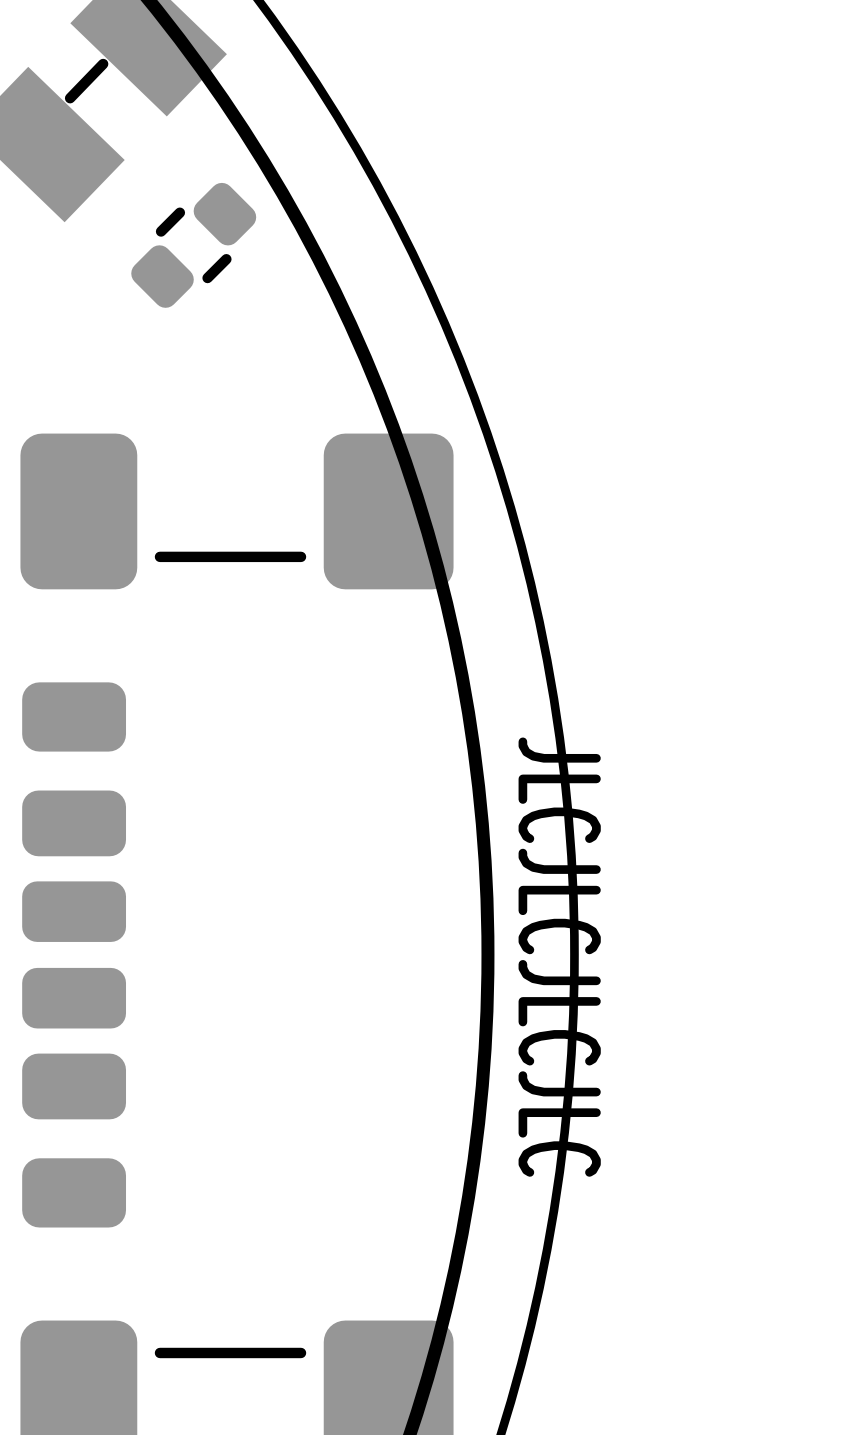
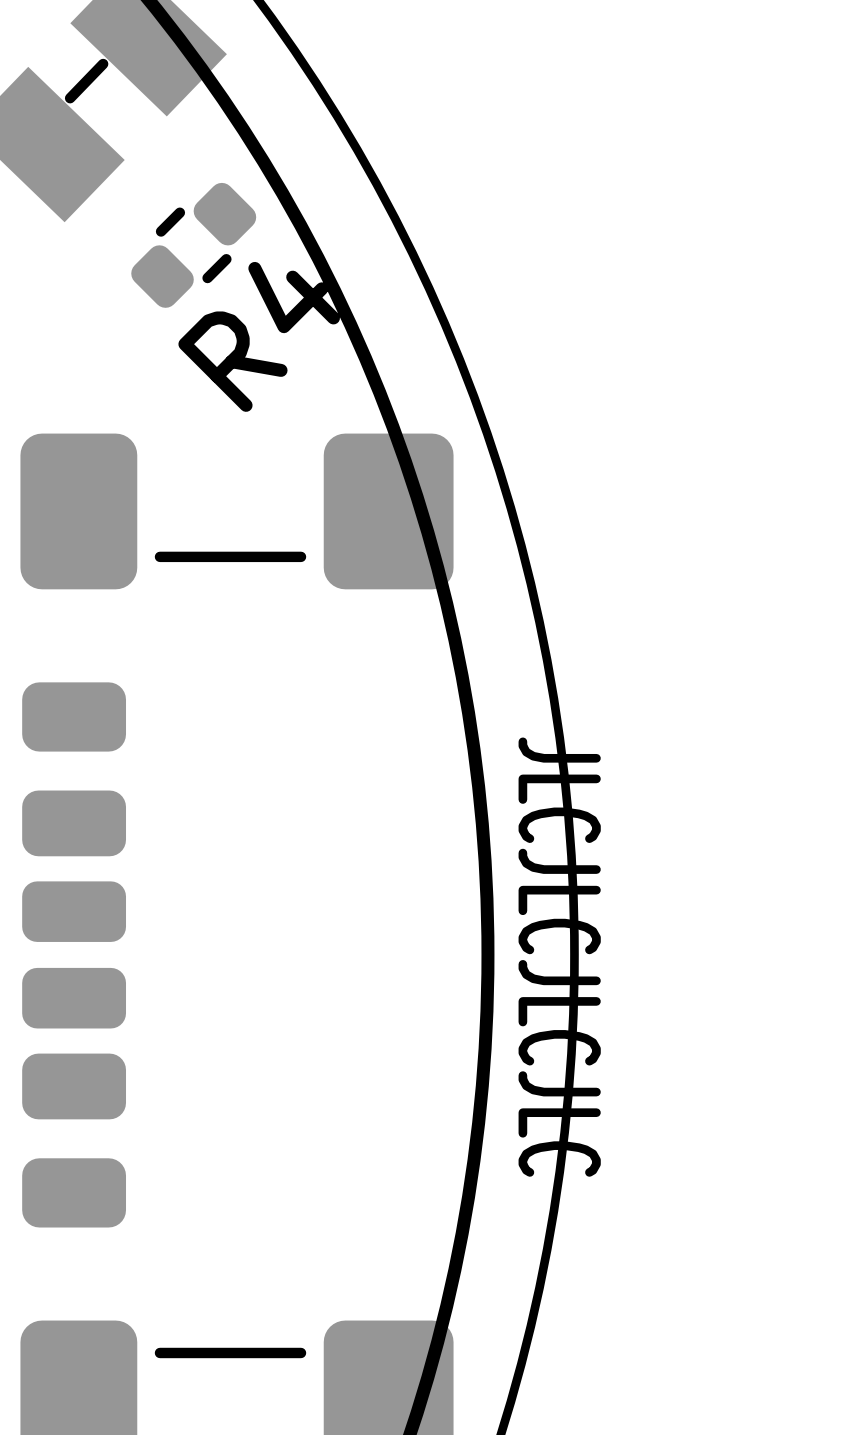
R4 name: none -> R4 (259, 336)

